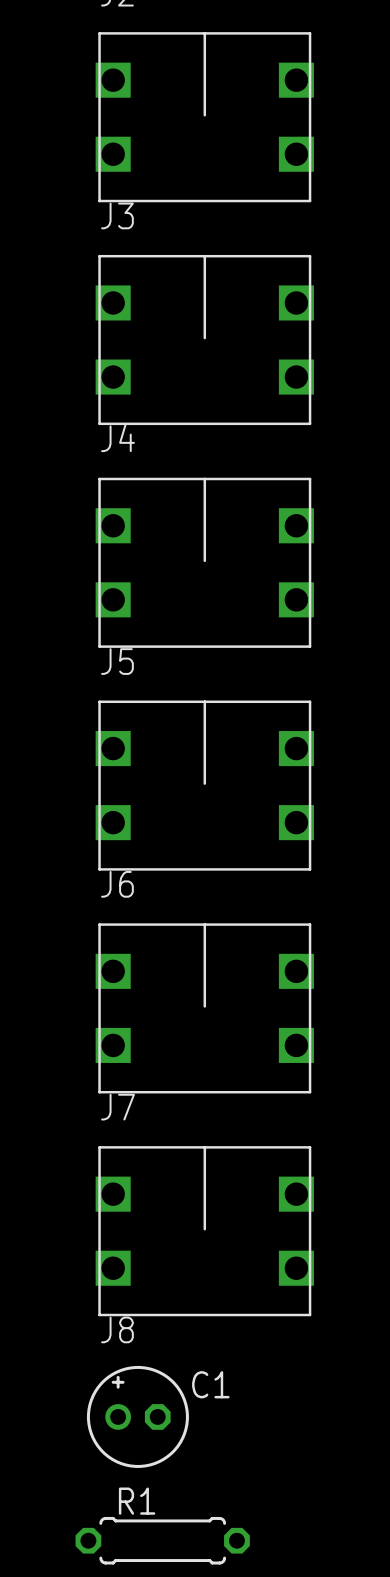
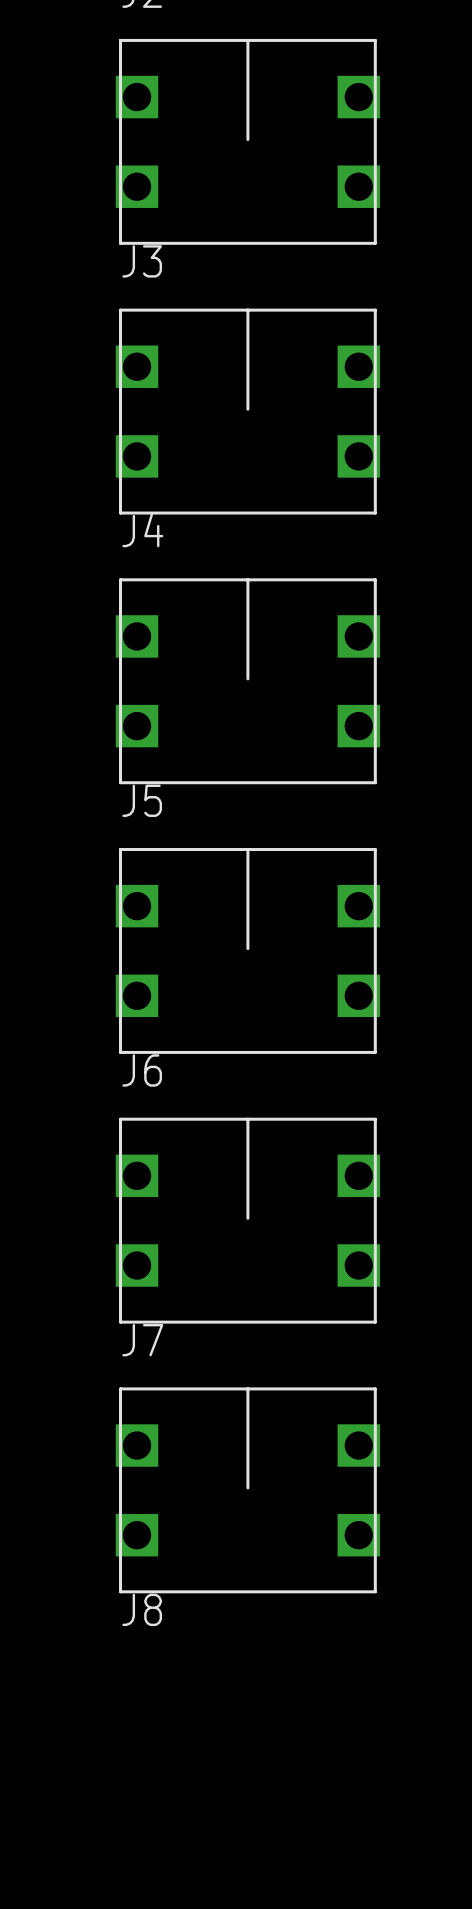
C1: (137, 1416) -> none
R1: (162, 1540) -> none

